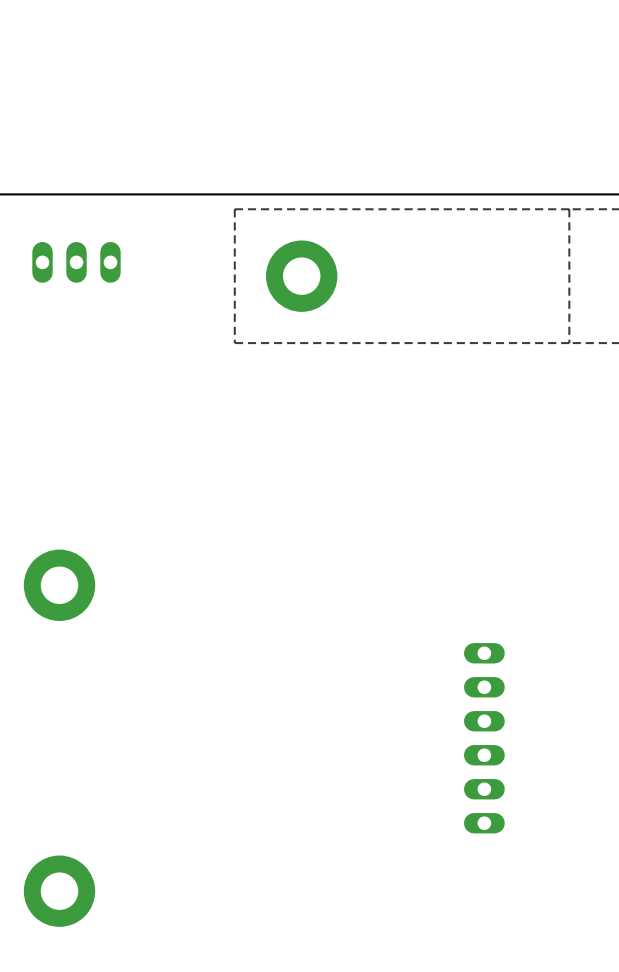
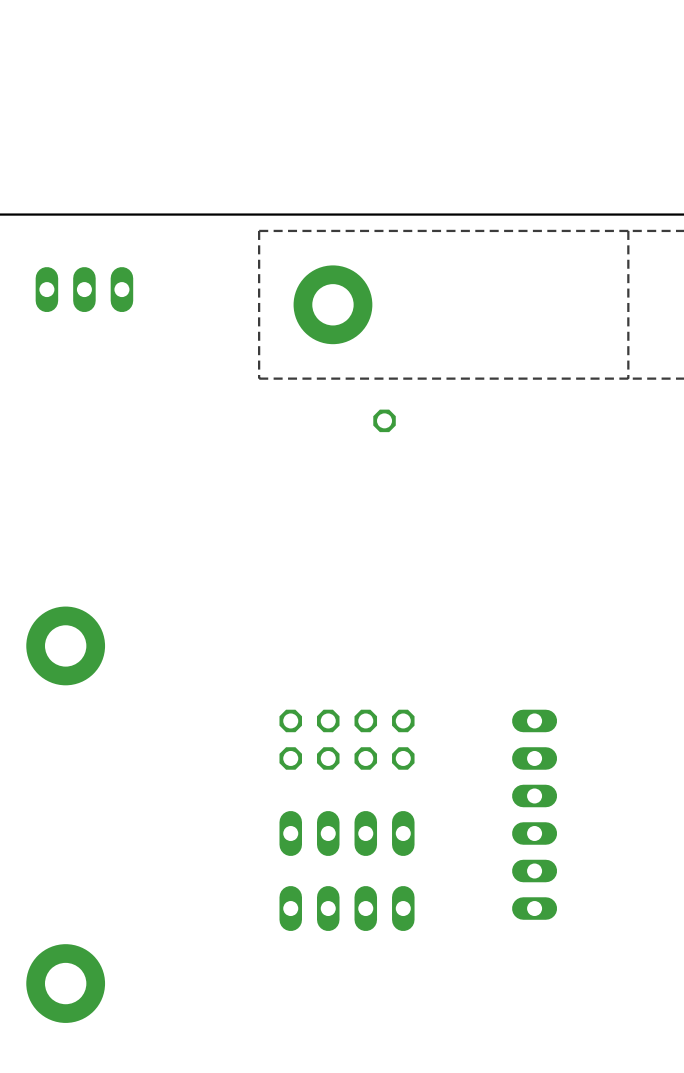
part: none -> (384, 420)
part: none -> (347, 739)
part: none -> (347, 833)
part: none -> (347, 908)

